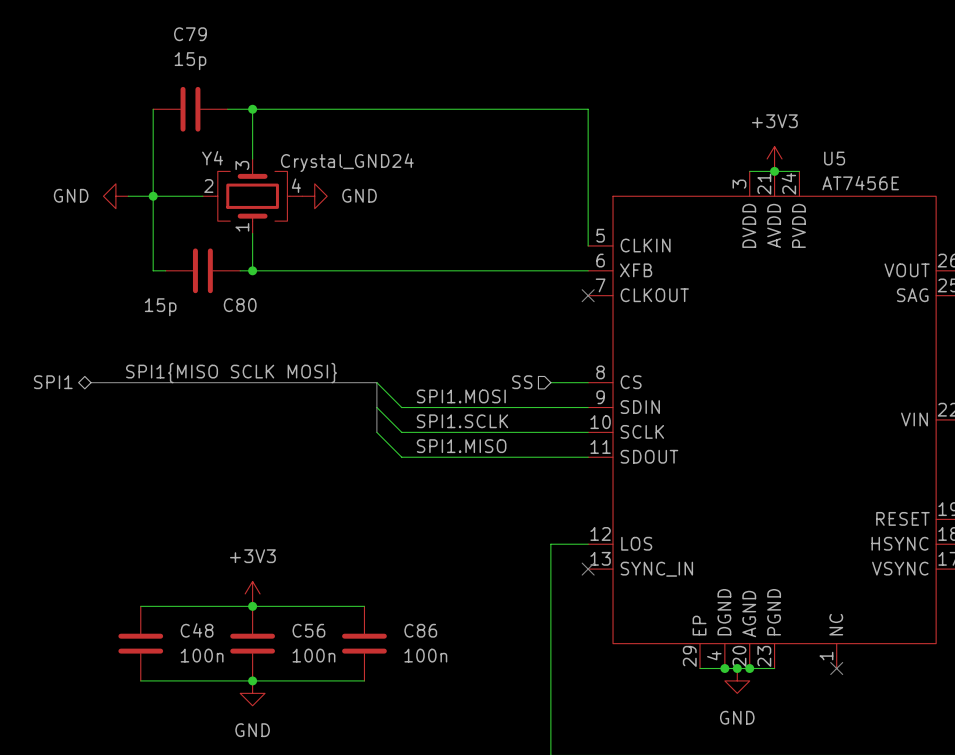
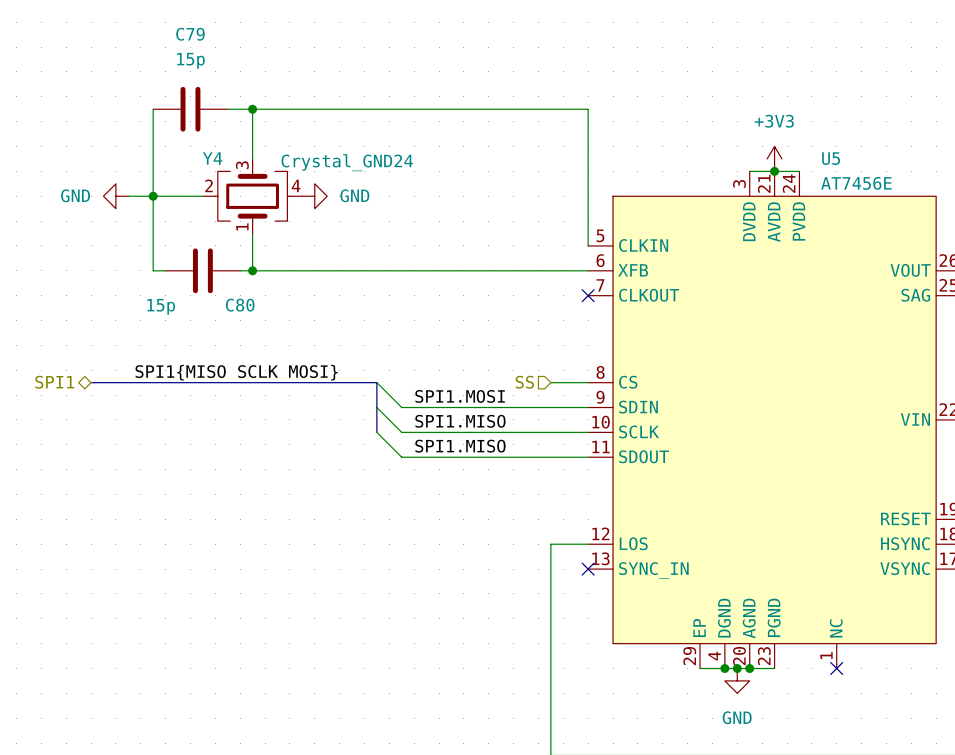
label: SPI1.SCLK (462, 421) -> SPI1.MISO (460, 421)
power symbol: +3V3 (252, 593) -> none
wire: (140, 606) (364, 606) -> none
junction: (252, 606) -> none
C48: 100n (140, 643) -> none
C56: 100n (252, 643) -> none
C86: 100n (364, 643) -> none
wire: (140, 680) (364, 680) -> none
junction: (252, 680) -> none
power symbol: GND (252, 693) -> none

